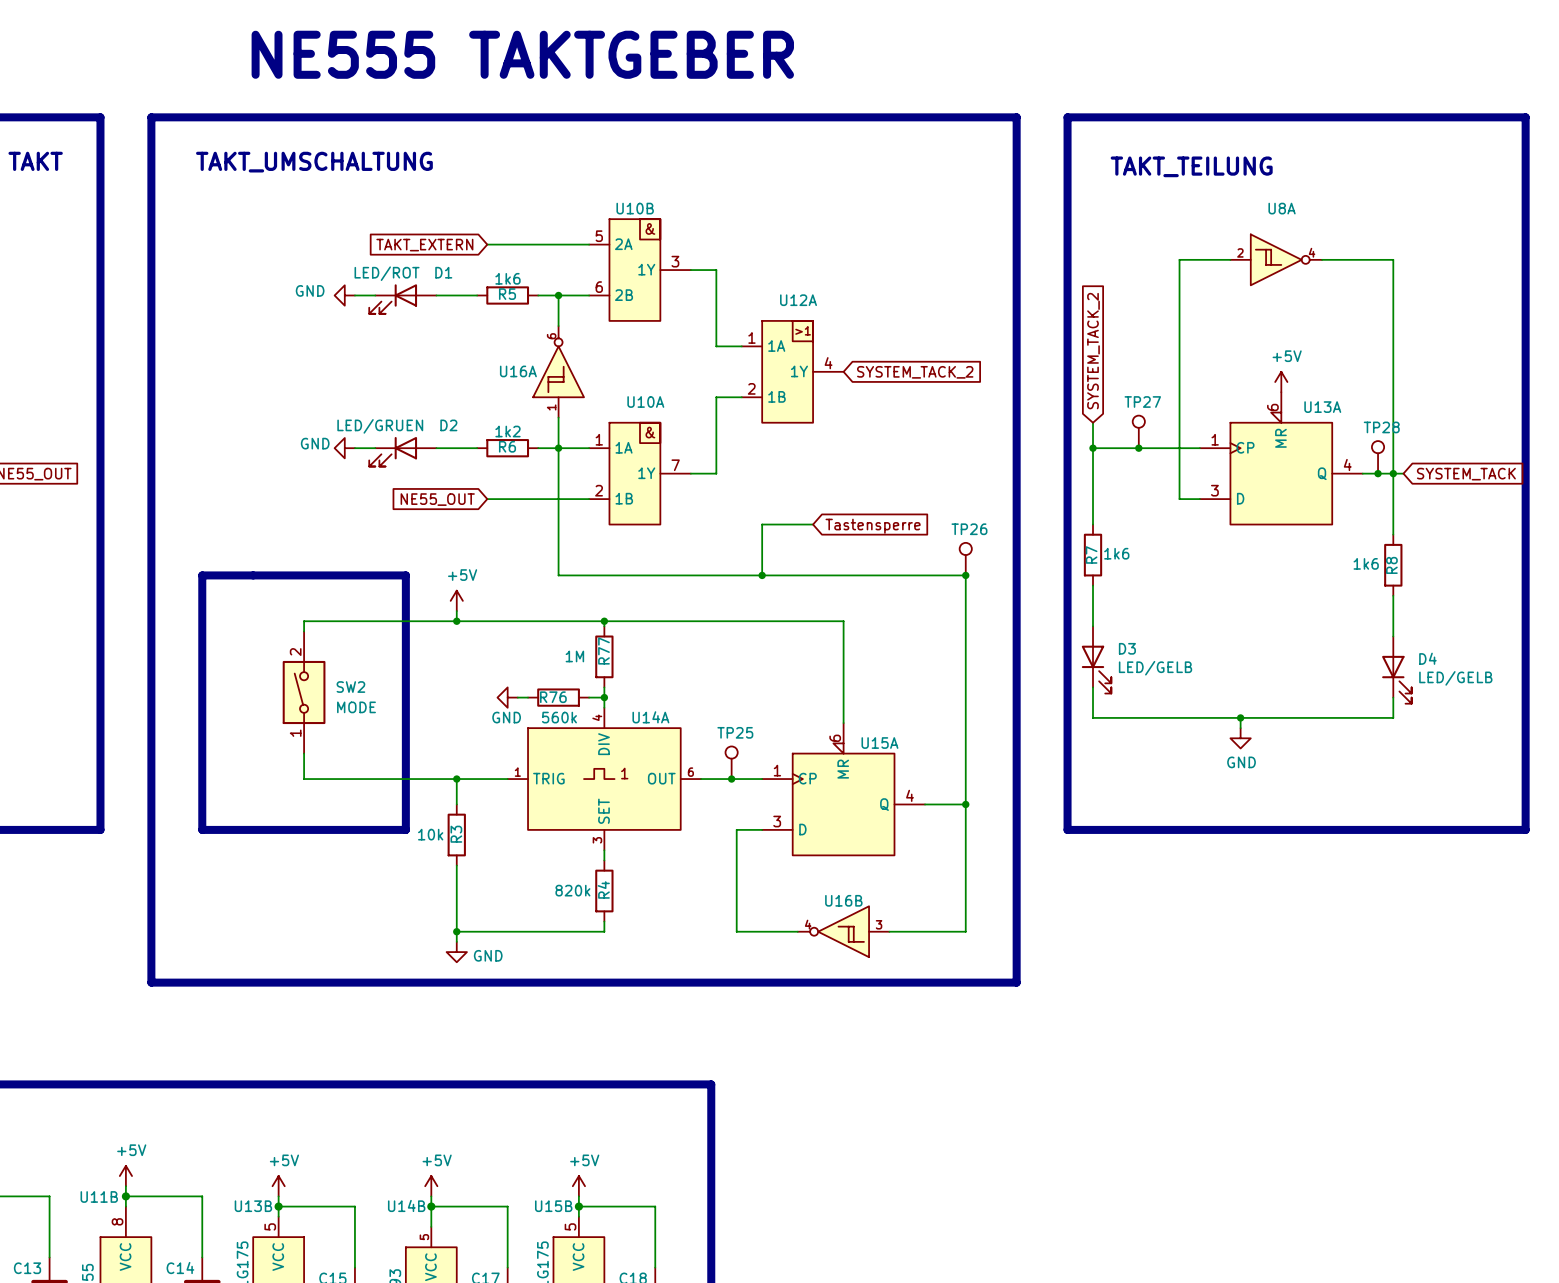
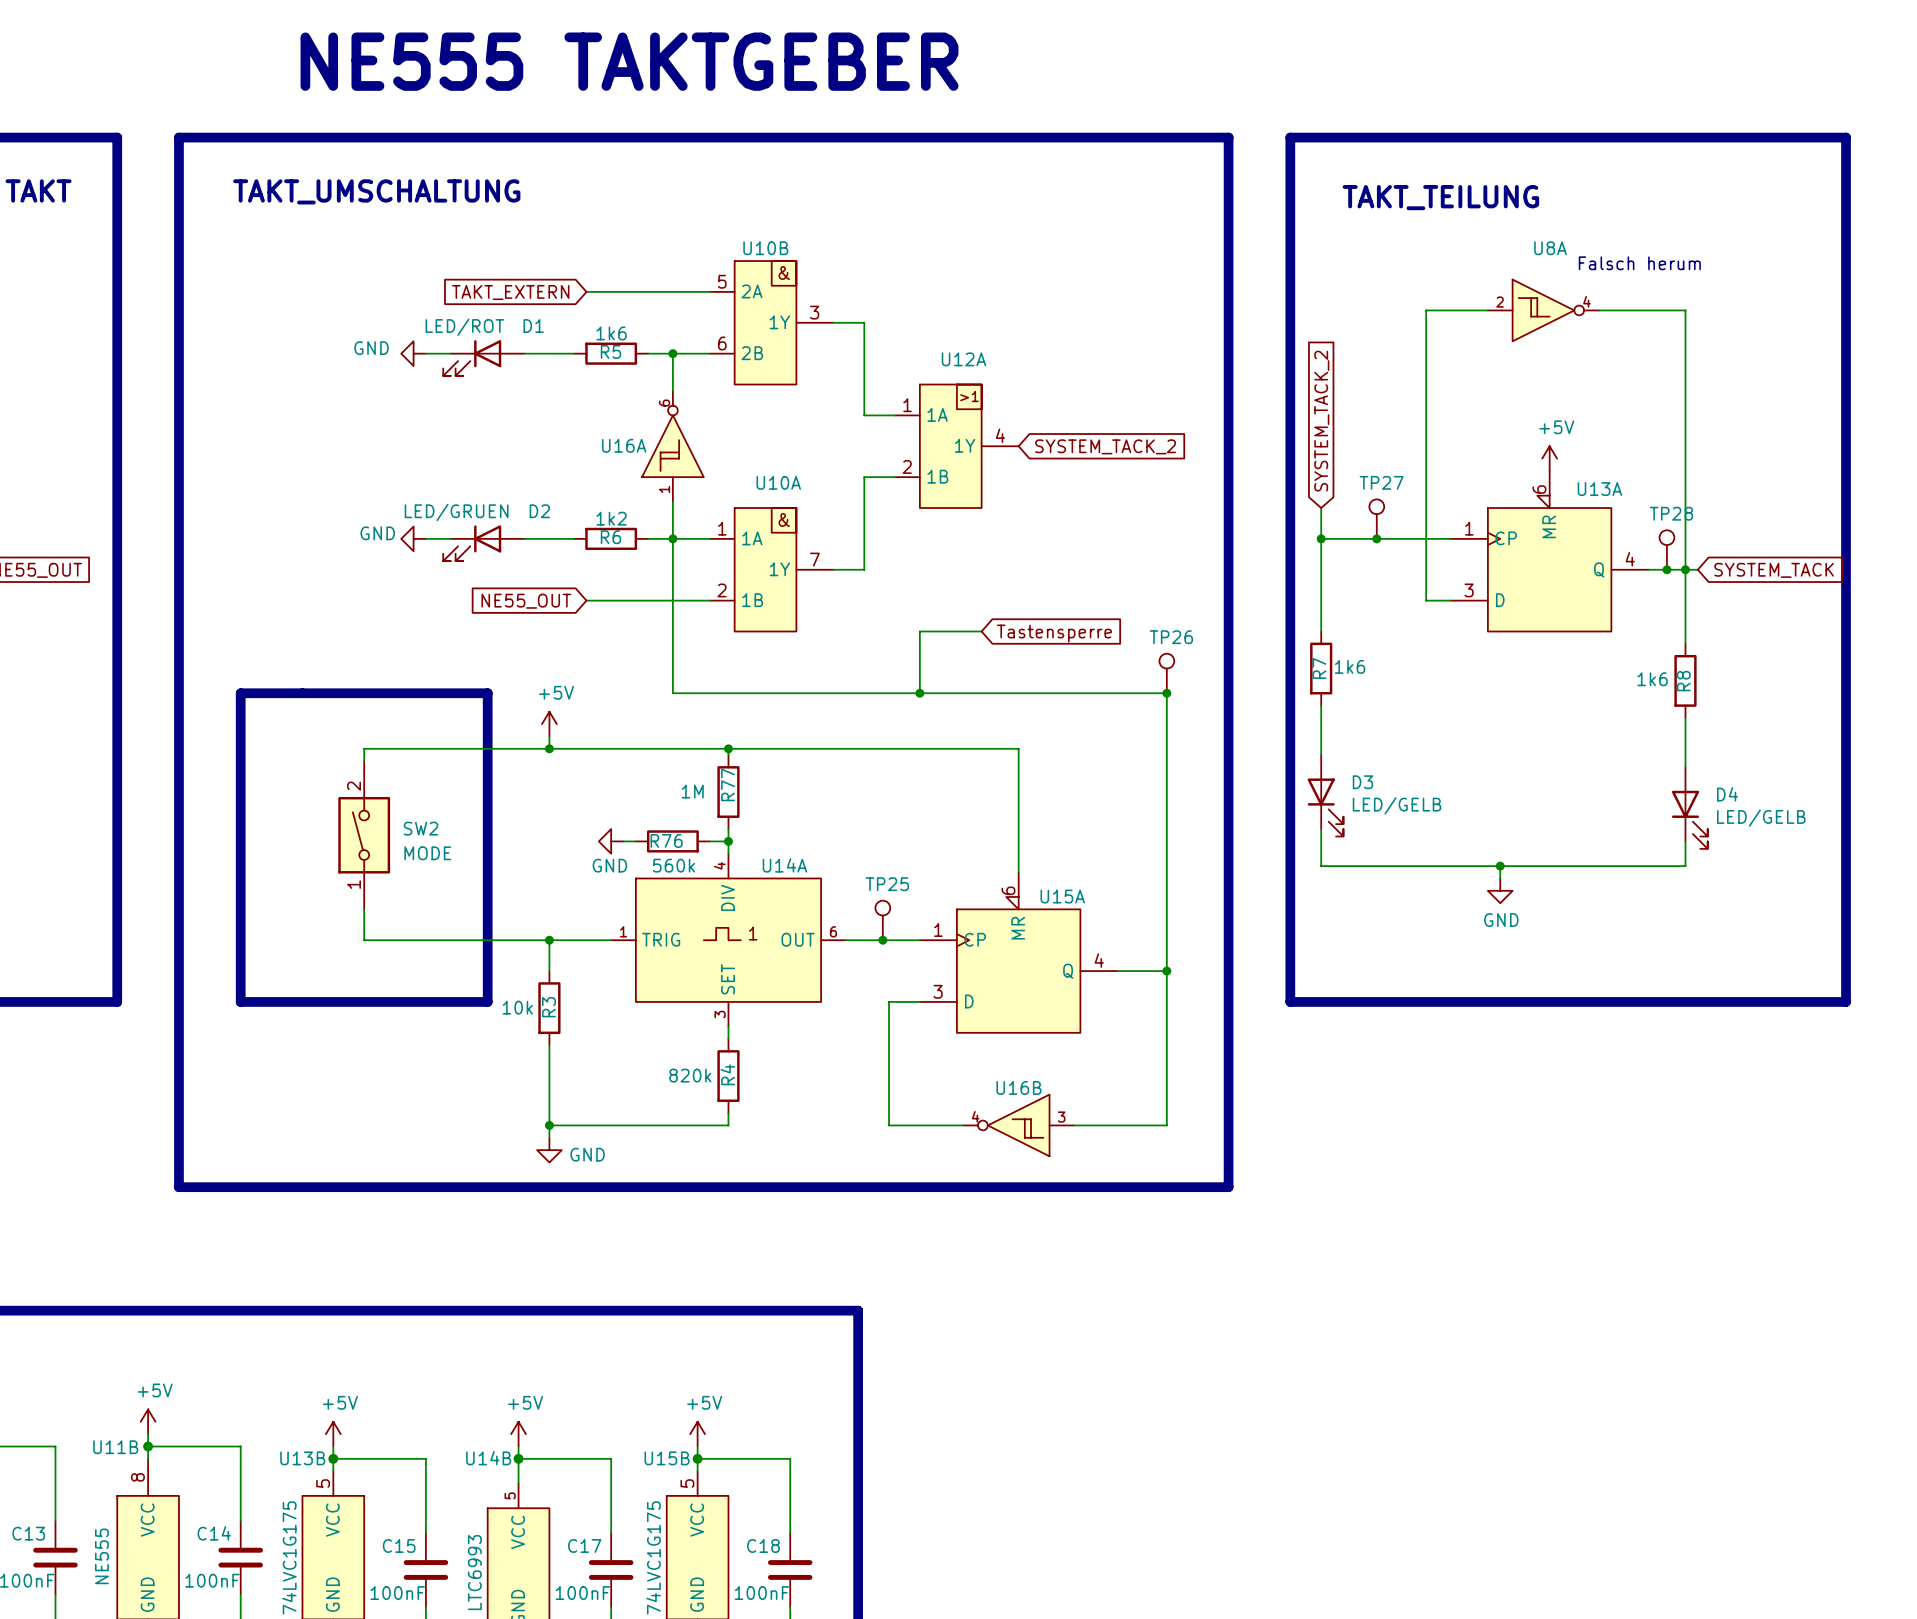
text: none -> Falsch herum (1639, 263)

